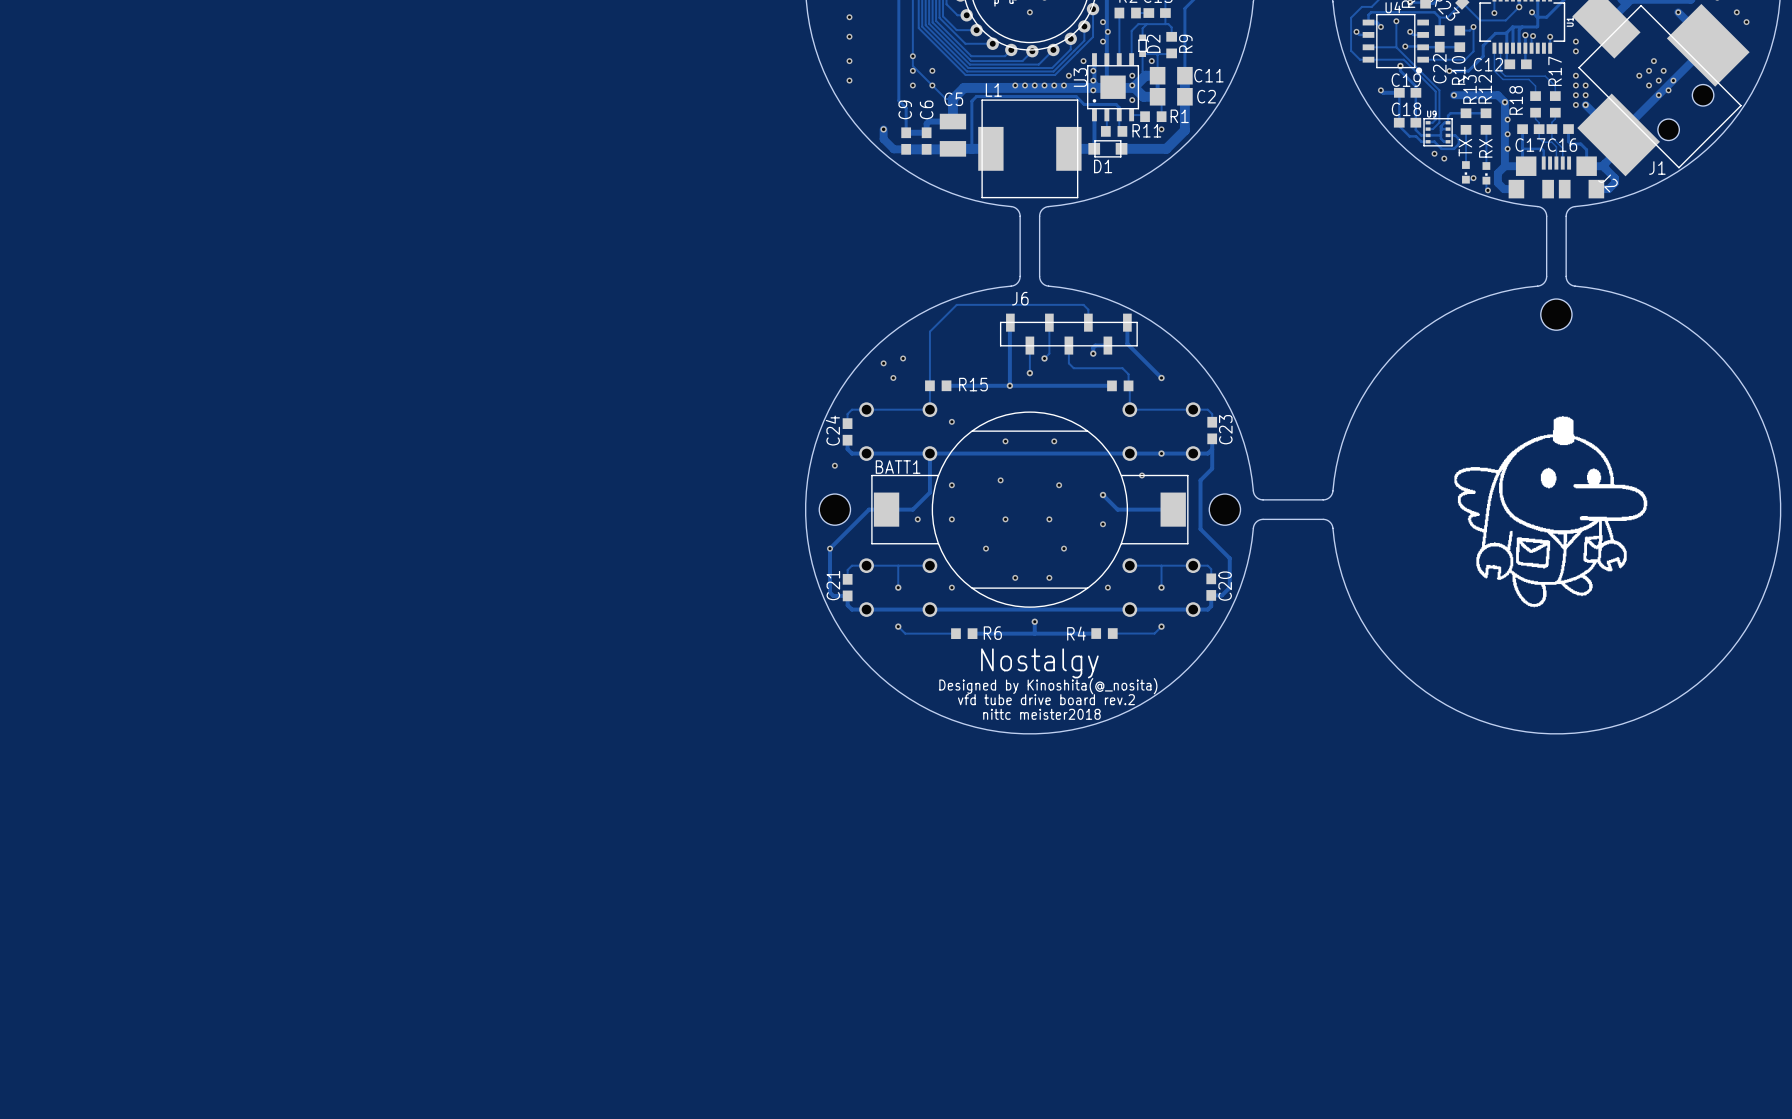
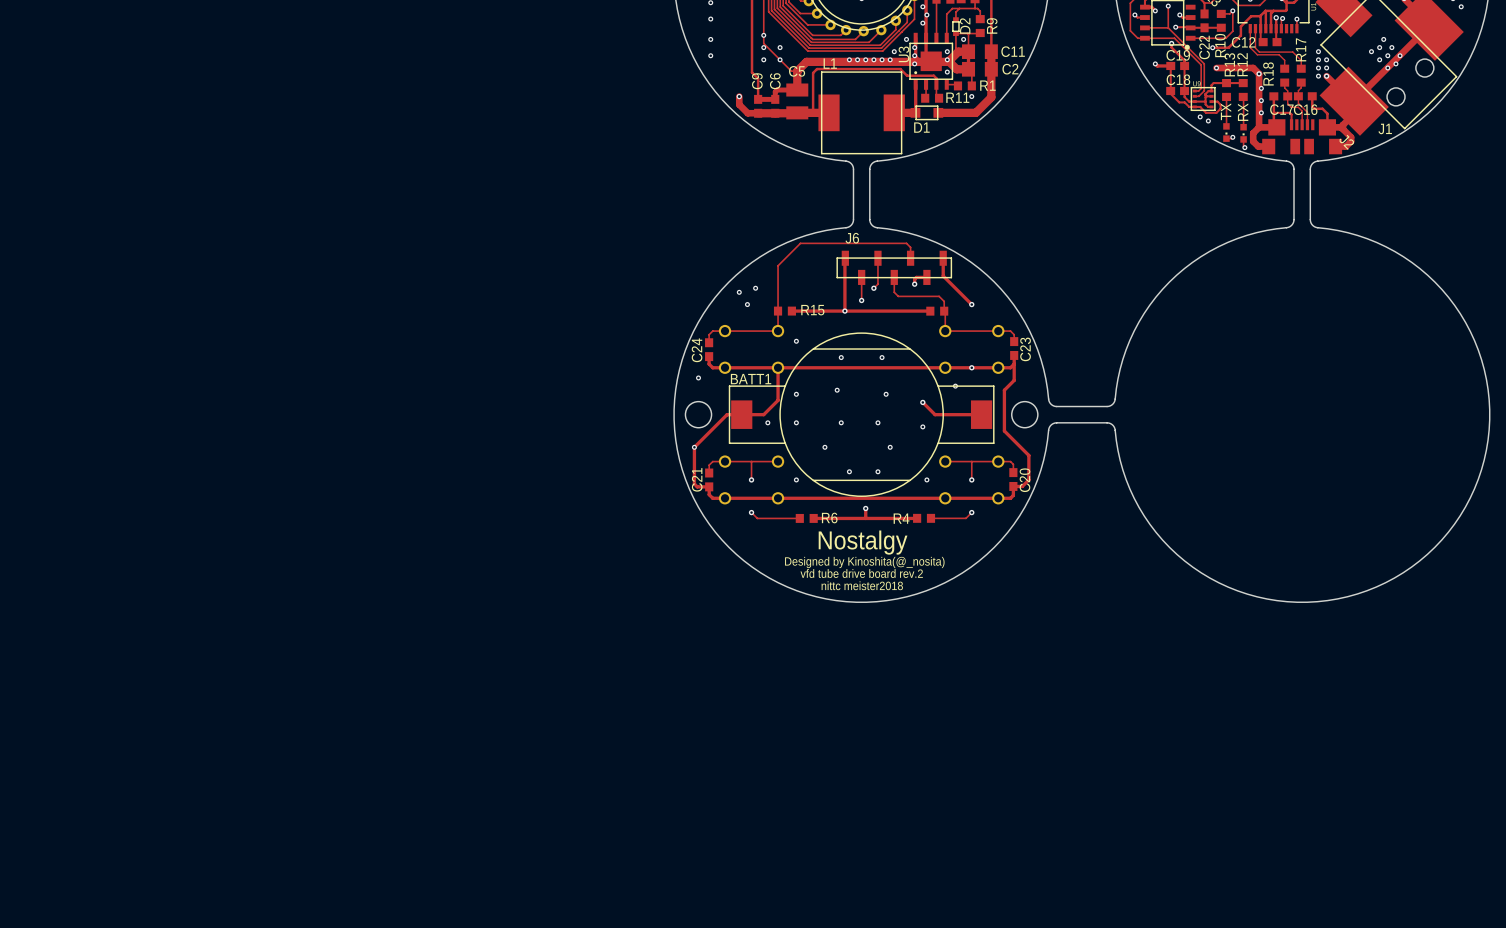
hole: (1556, 314) -> none
drawing: [1454, 416, 1648, 608] -> none

